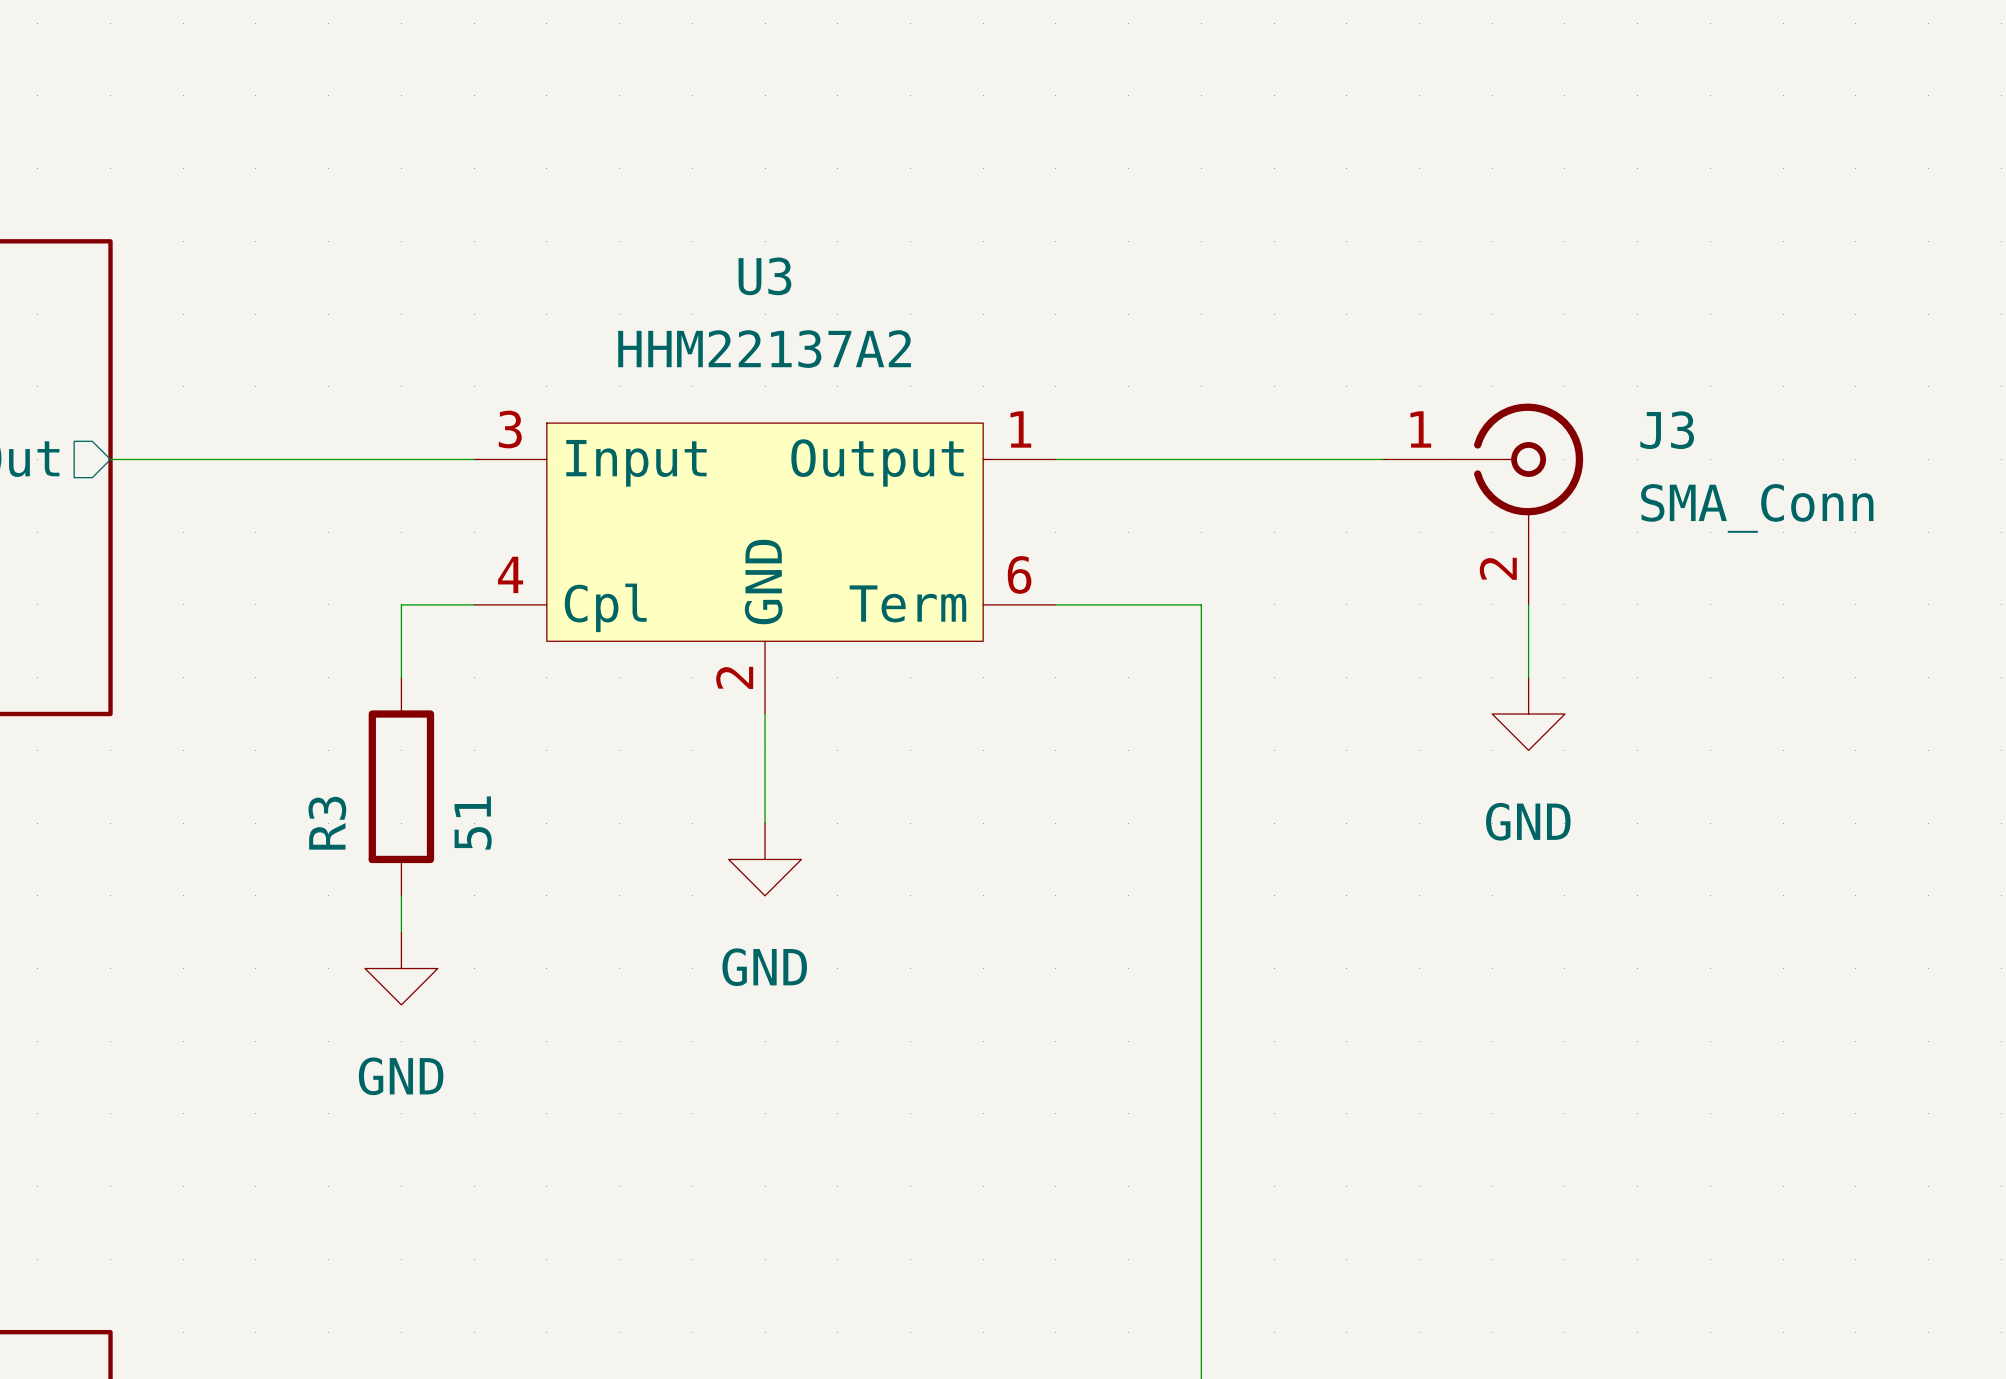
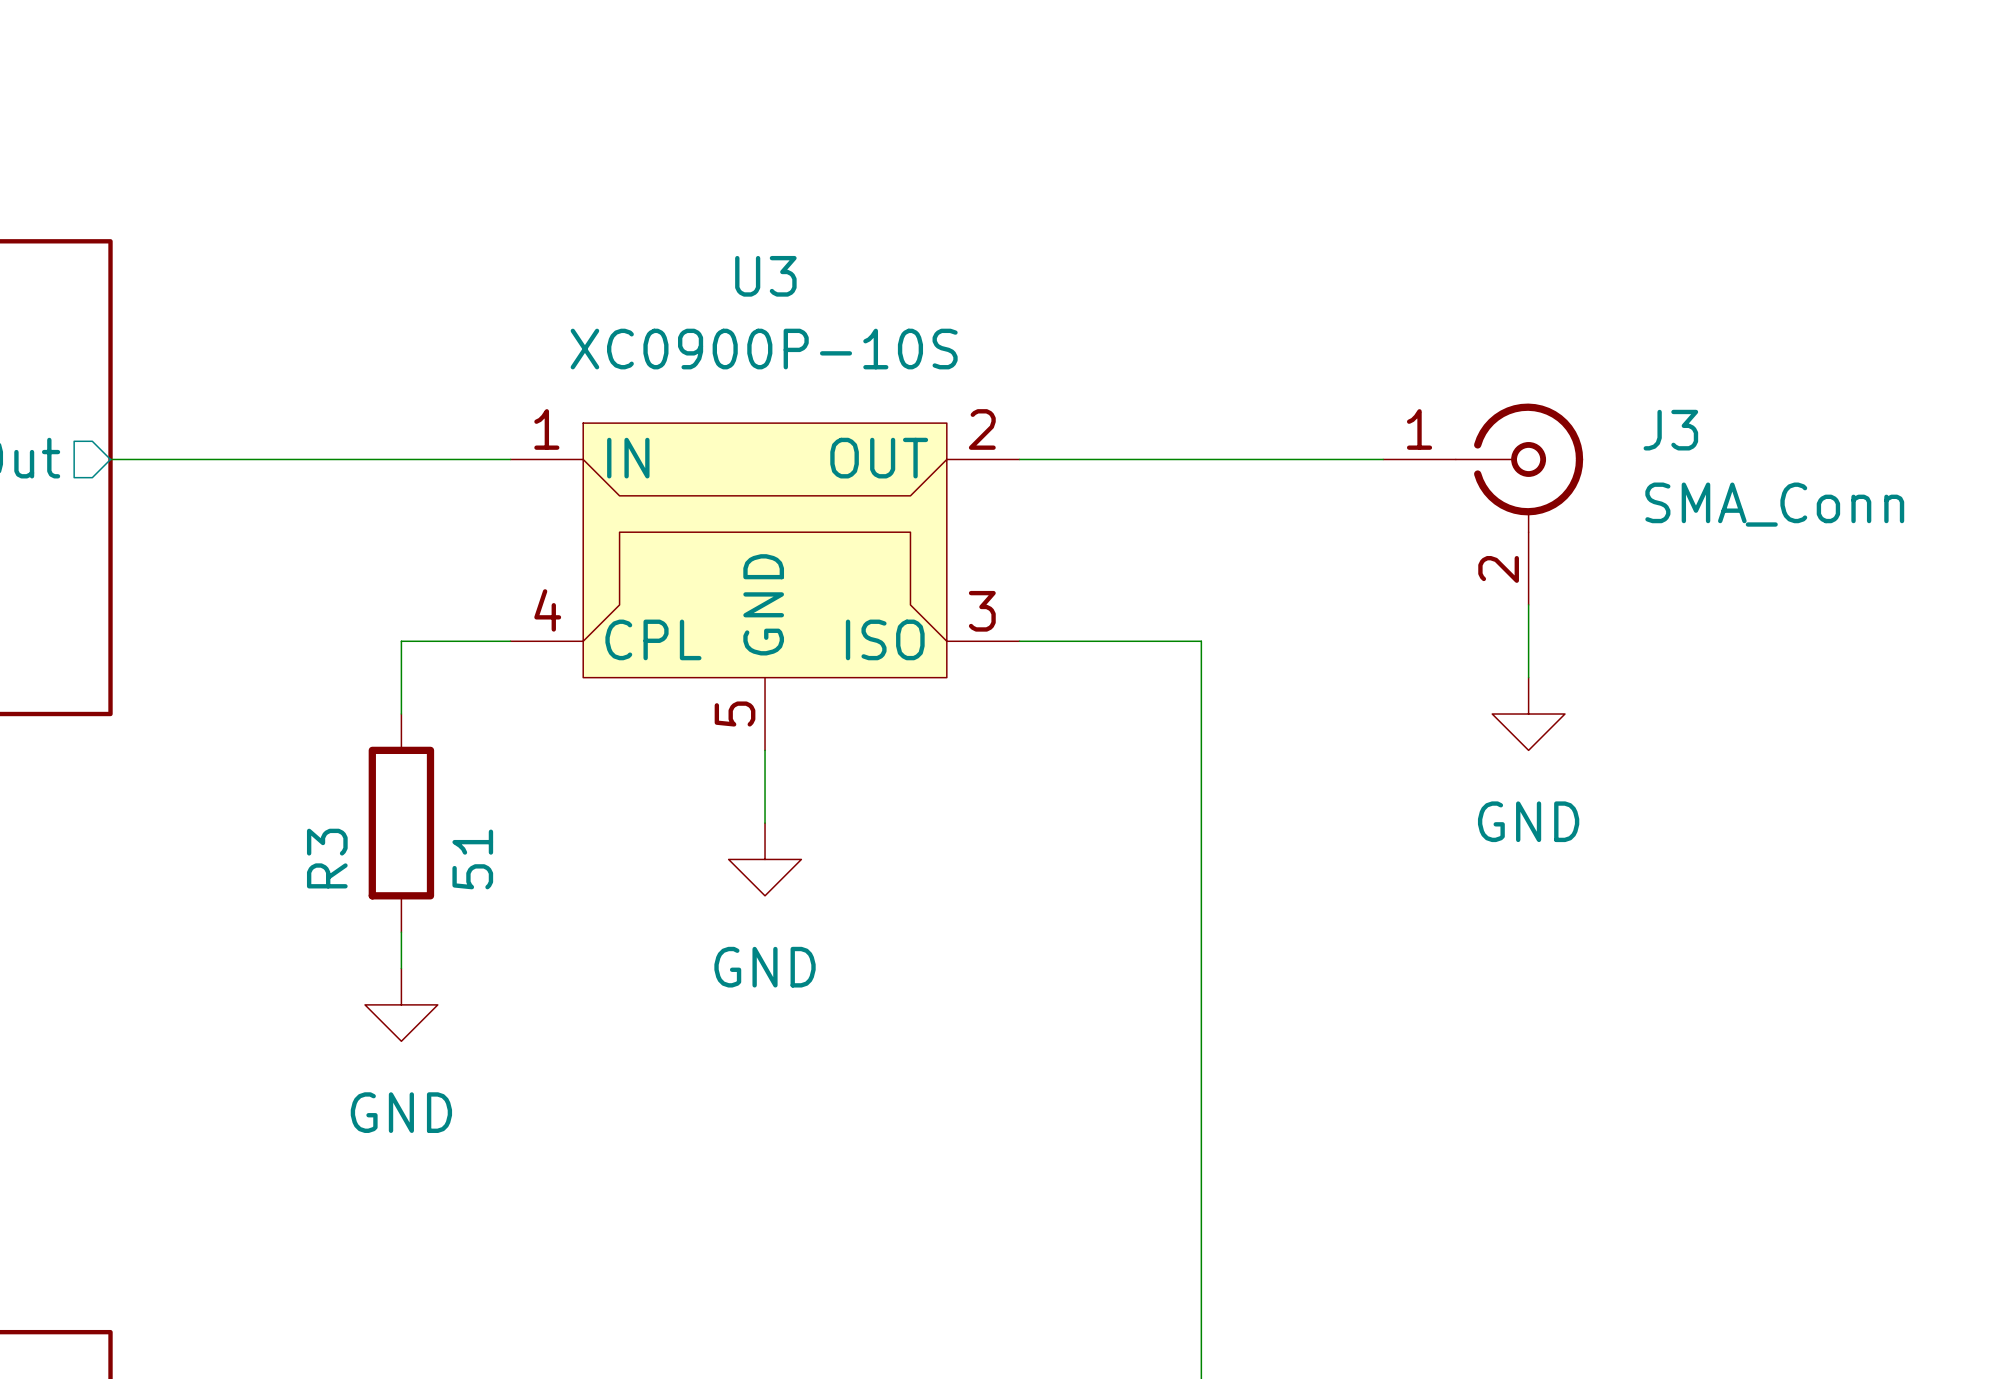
U3 value: HHM22137A2 (764, 349) -> XC0900P-10S (764, 349)
U3 symbol: [474, 423, 1056, 715] -> [510, 423, 1020, 751]
wire: (474, 604) (401, 604) (401, 641) -> (510, 641) (401, 641)
wire: (1055, 604) (1201, 604) (1201, 641) -> (1019, 641) (1201, 641)
R3 position: (401, 786) -> (401, 823)
power symbol position: GND (401, 968) -> GND (401, 1004)

